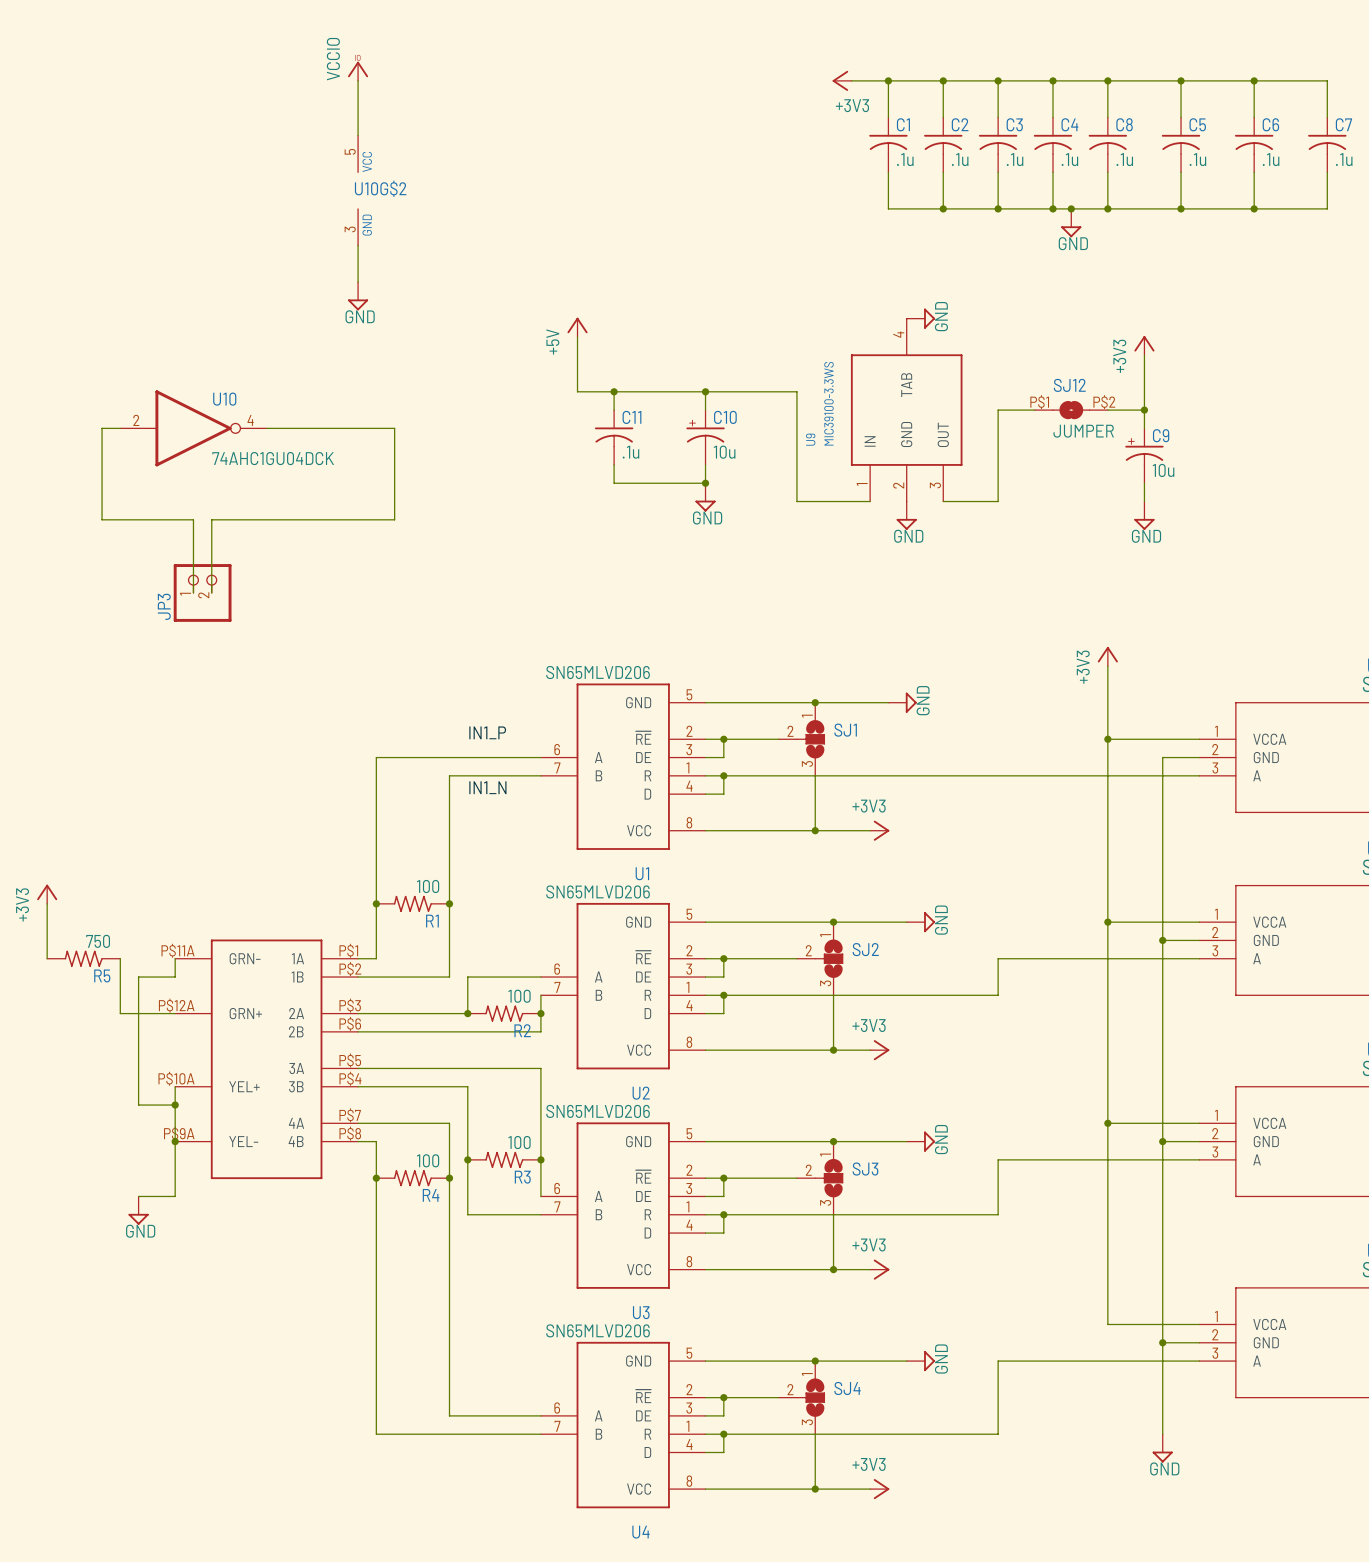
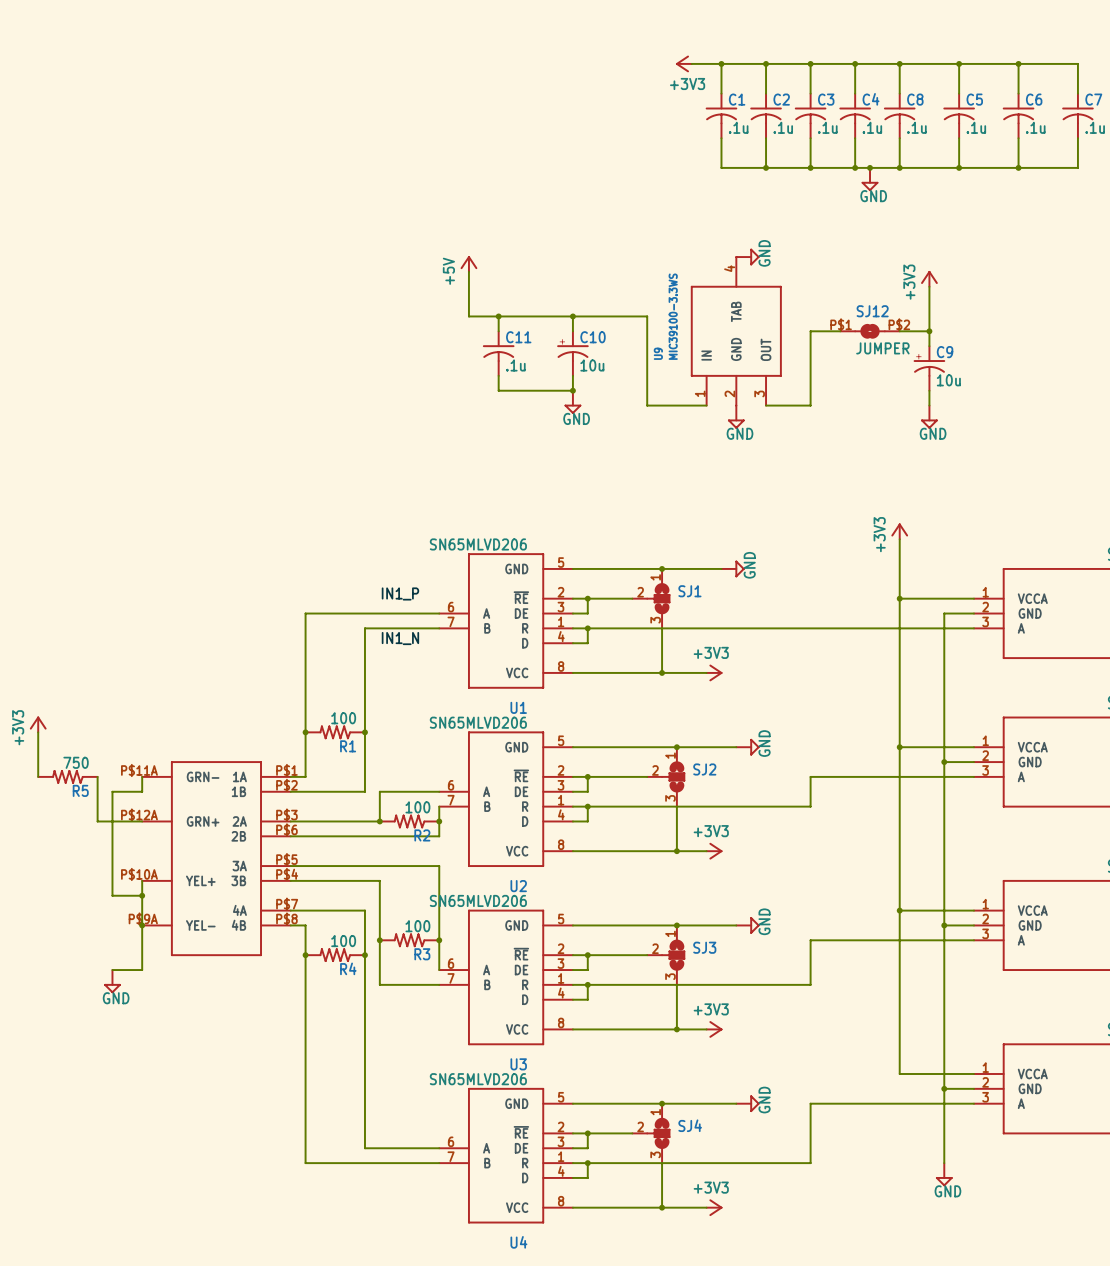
power symbol: VCCIO (358, 71) -> none
wire: (358, 80) (358, 135) -> none
U10G$2: (358, 190) -> none
wire: (358, 245) (358, 282) -> none
power symbol: GND (358, 296) -> none
wire: (120, 428) (102, 428) (102, 519) (193, 519) (193, 592) -> none
U10: 74AHC1GU04DCK (193, 428) -> none
wire: (266, 428) (394, 428) (394, 519) (211, 519) (211, 592) -> none
JP3: (202, 592) -> none

